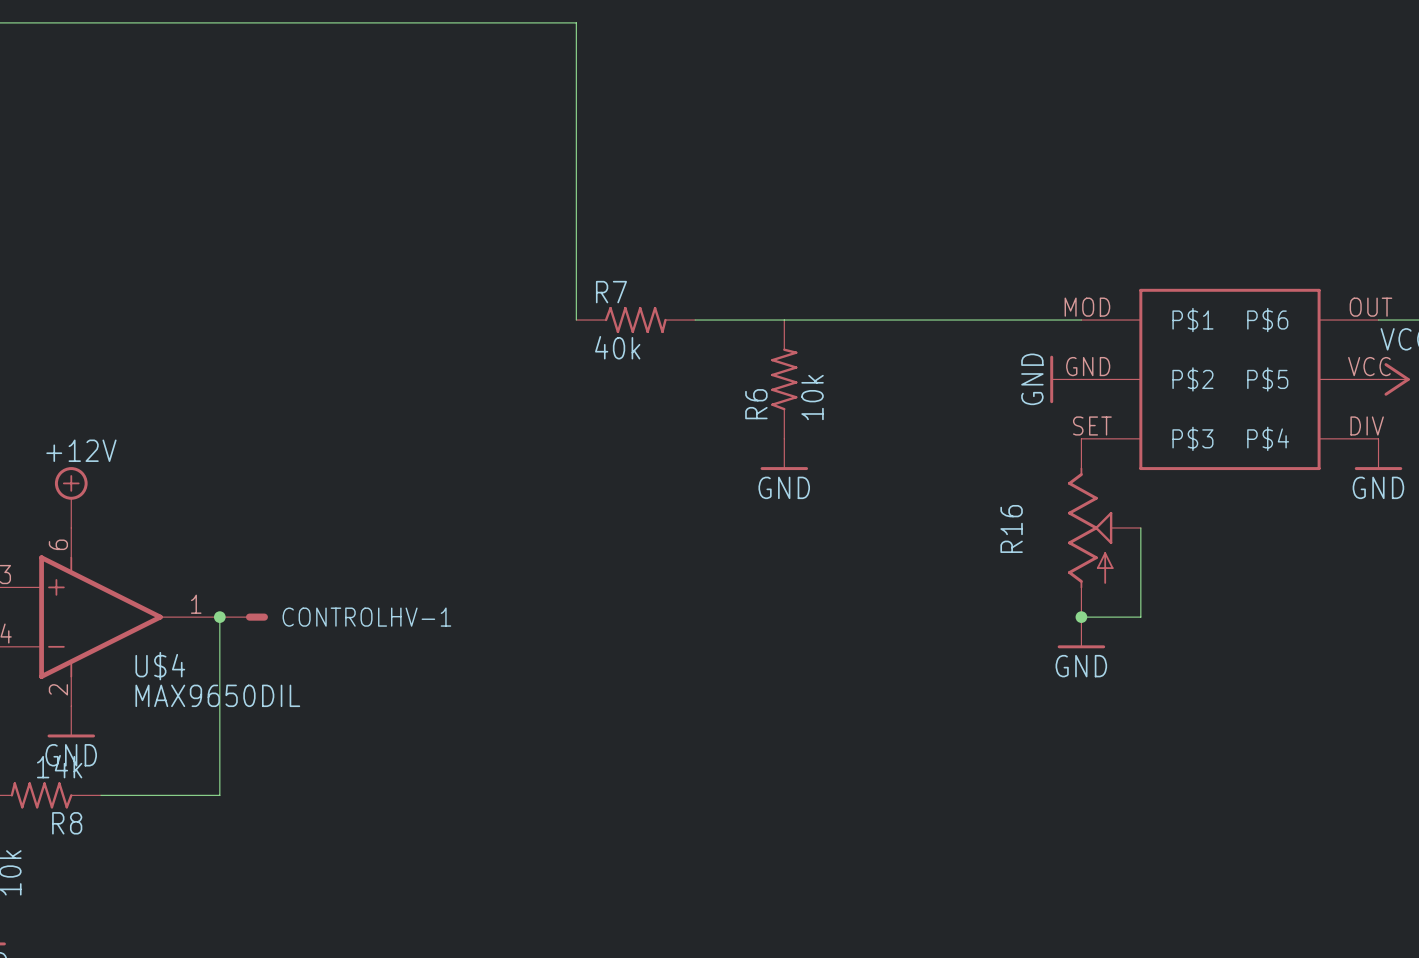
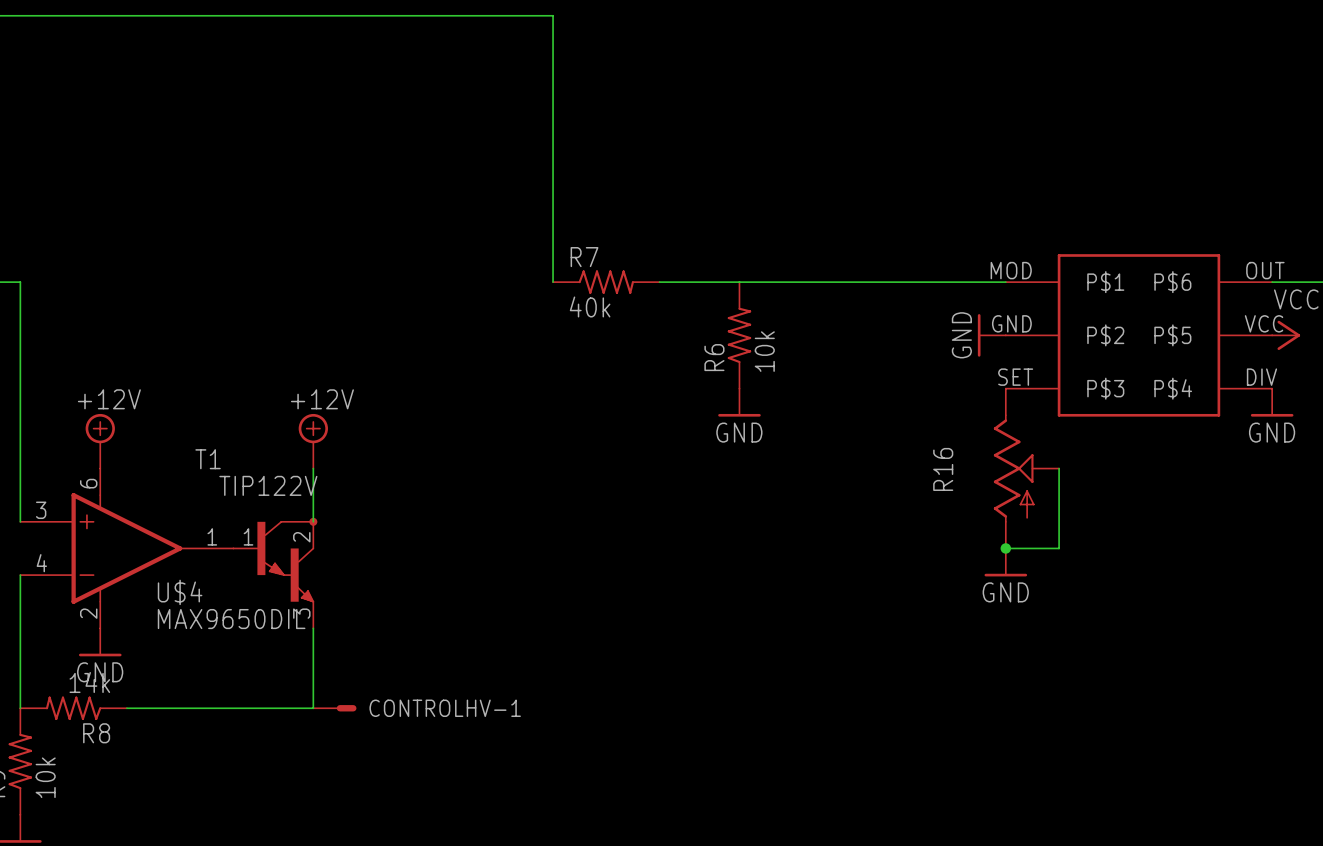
power symbol: none -> +12V (313, 441)
wire: none -> (313, 468) (313, 521)
wire: (219, 617) (219, 795) -> (313, 628) (313, 708) (233, 708)
junction: (219, 617) -> none
CONTROLHV-1 position: (243, 617) -> (334, 708)
T1: none -> TIP122V (275, 573)

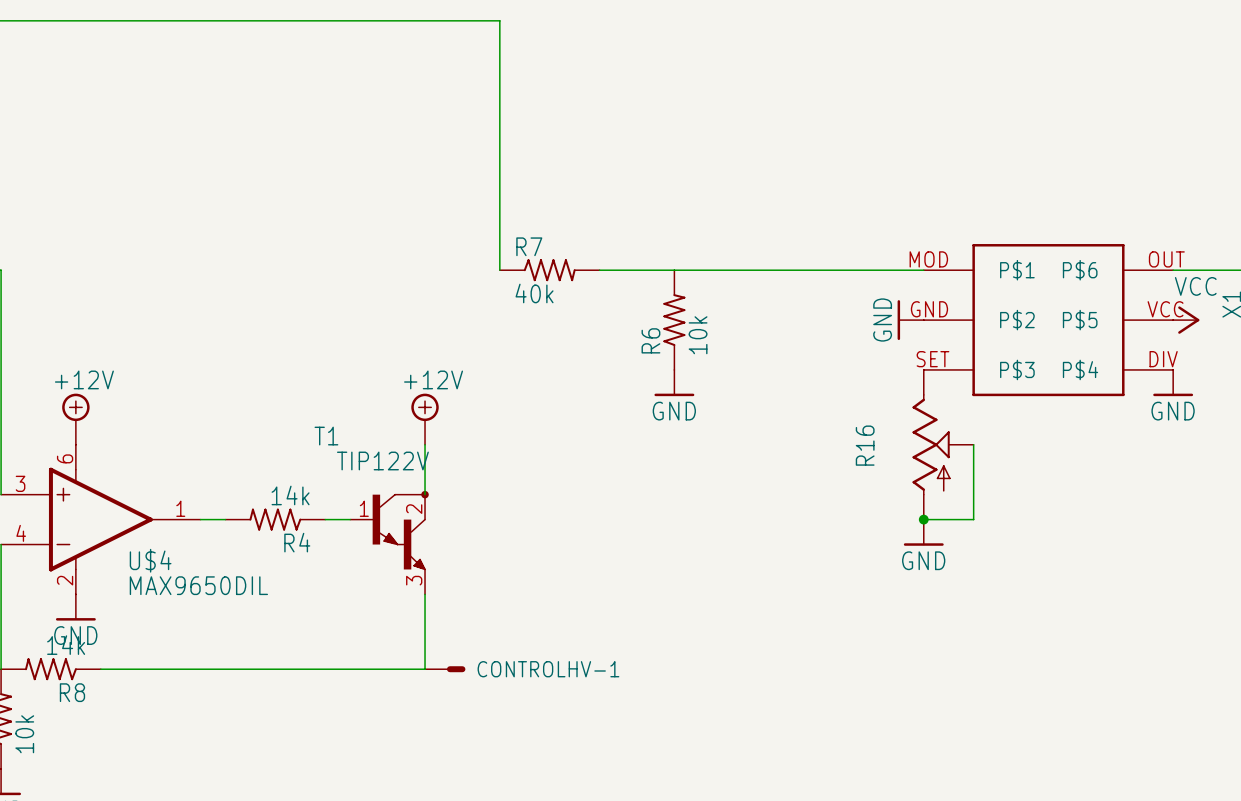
power symbol position: +12V (313, 441) -> +12V (425, 419)
wire: (313, 468) (313, 521) -> (425, 444) (425, 494)
R4: none -> 14k (275, 519)
wire: none -> (325, 519) (350, 519)
T1 position: (275, 573) -> (389, 542)
wire: (313, 628) (313, 708) -> (425, 594) (425, 669) (275, 669)
CONTROLHV-1 position: (334, 708) -> (445, 669)

